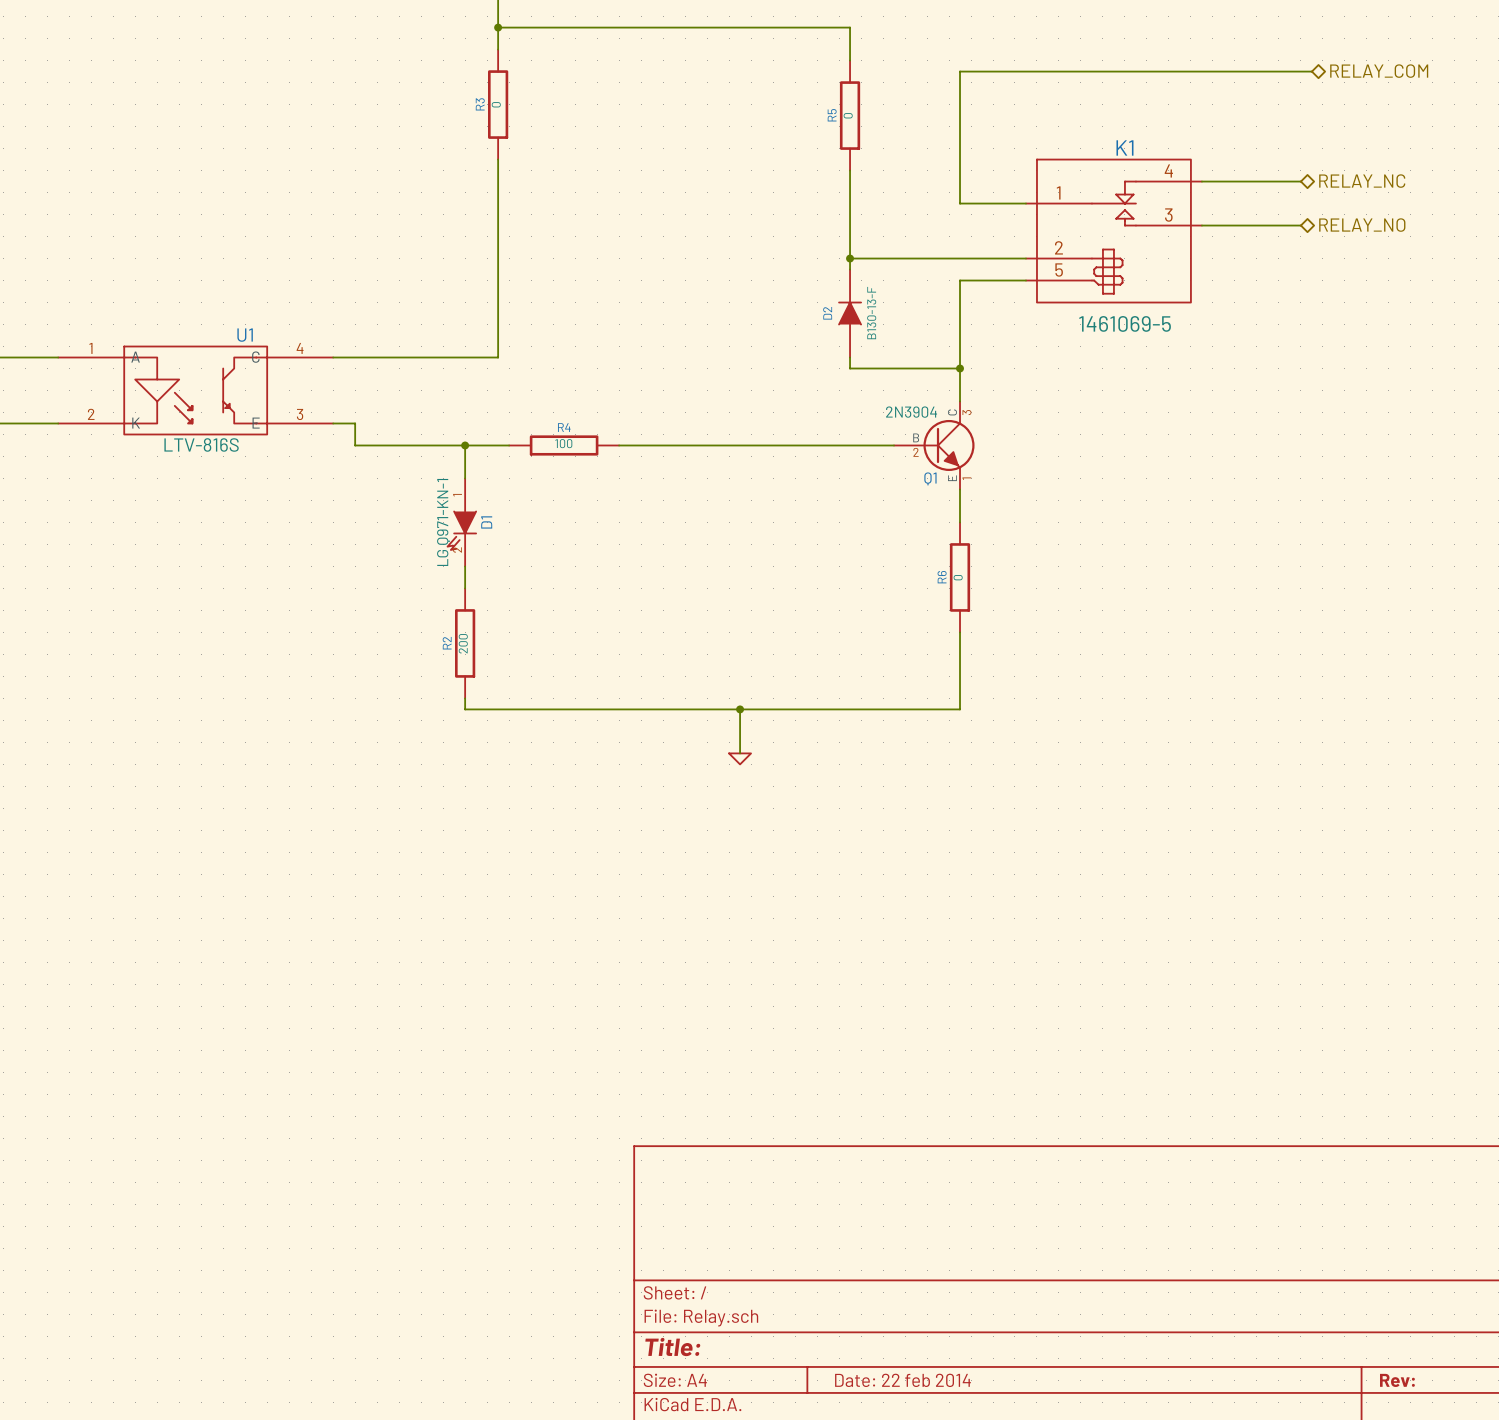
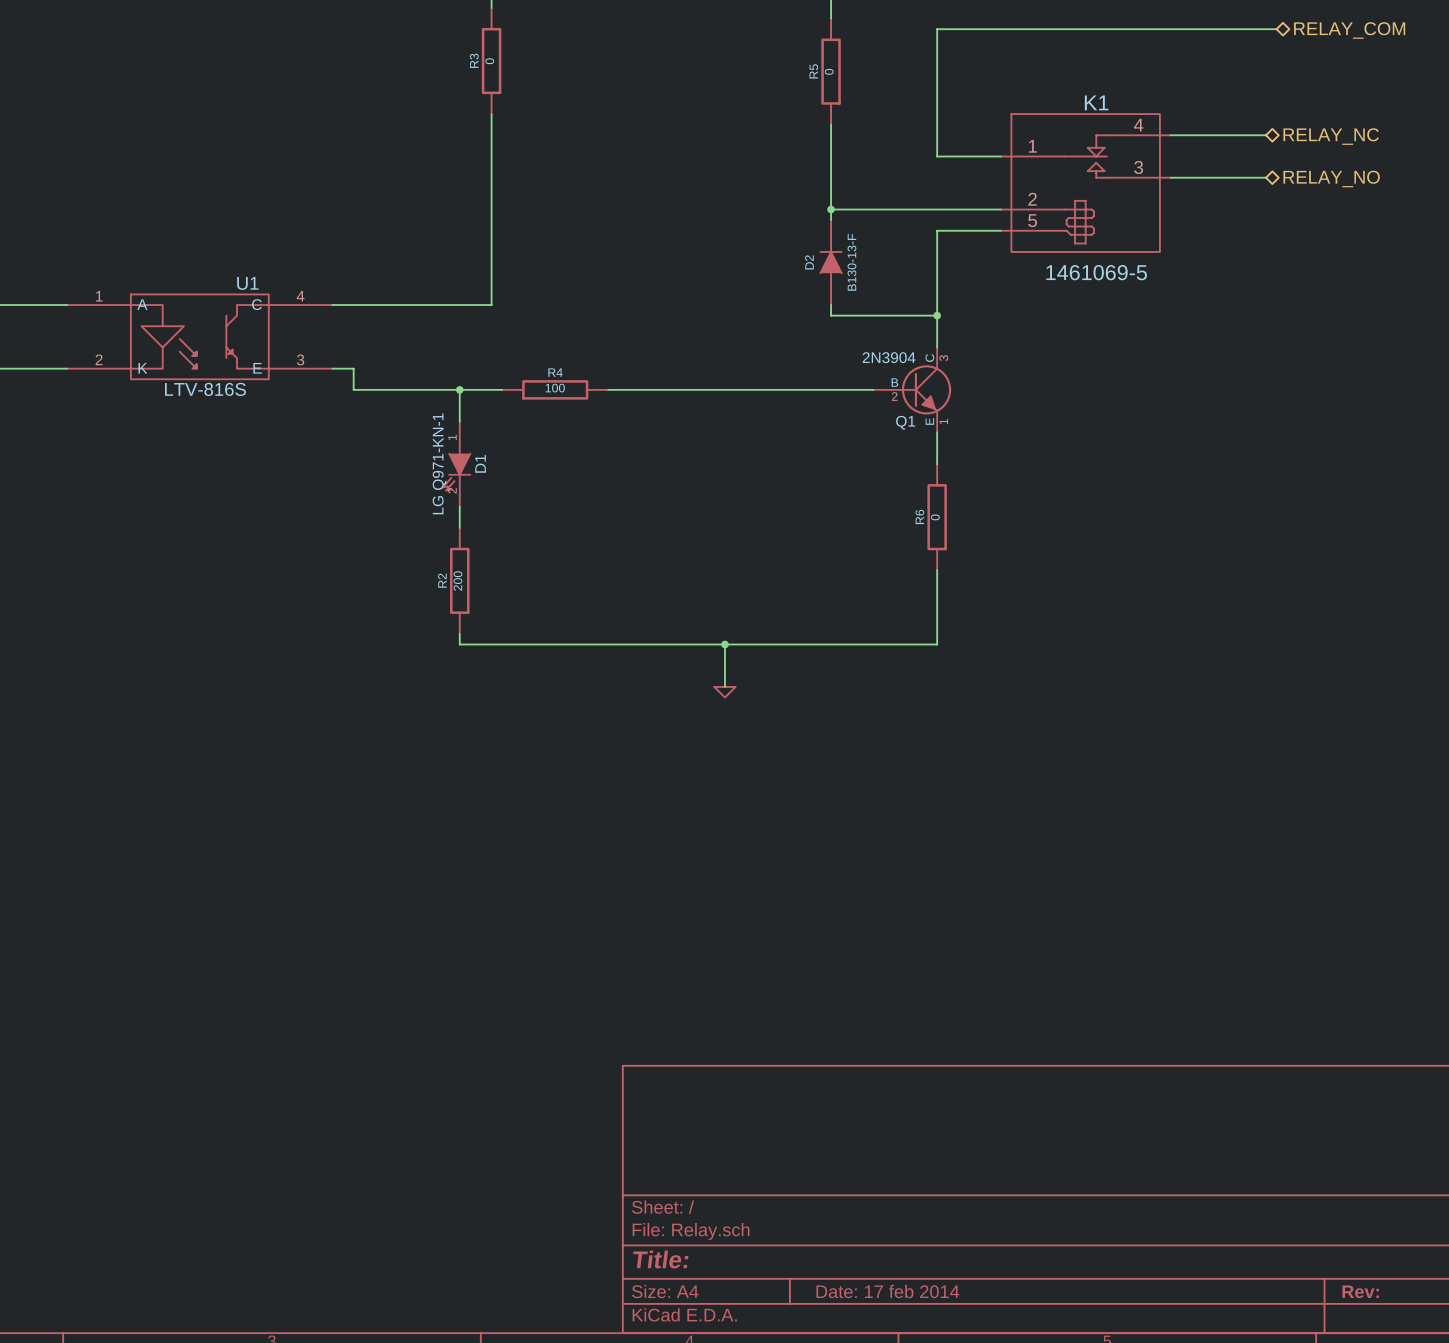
title block: Date: 22 feb 2014 (902, 1380) -> Date: 17 feb 2014 (887, 1291)

